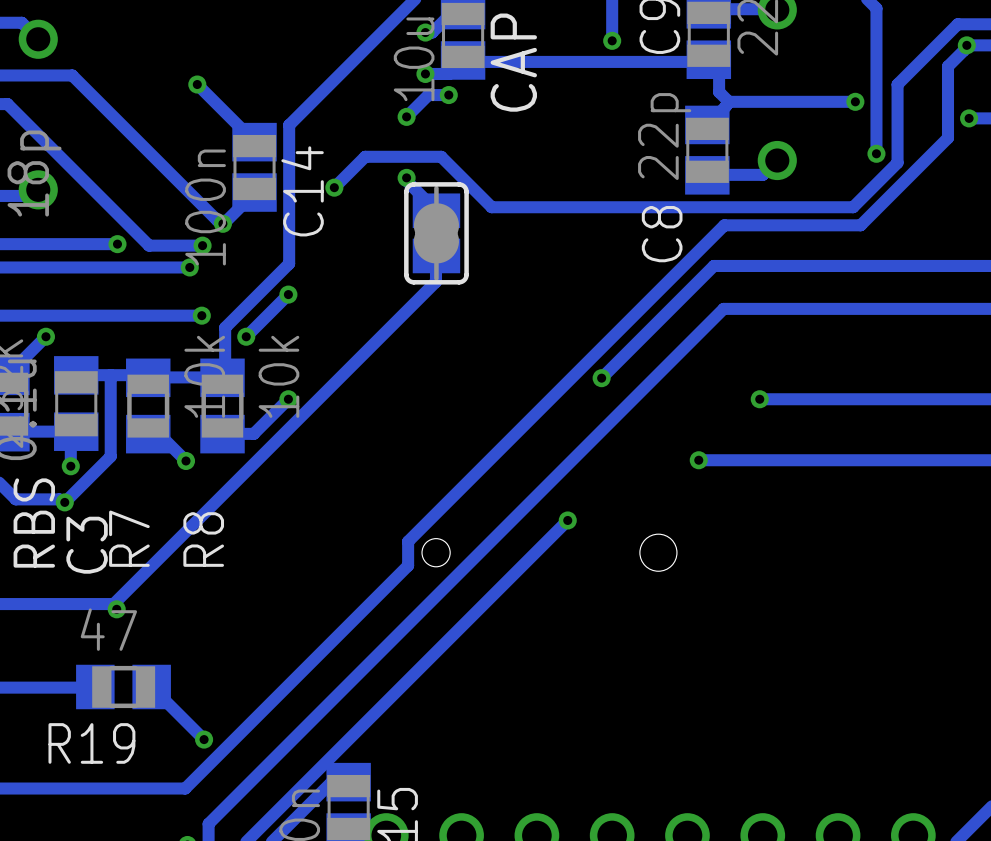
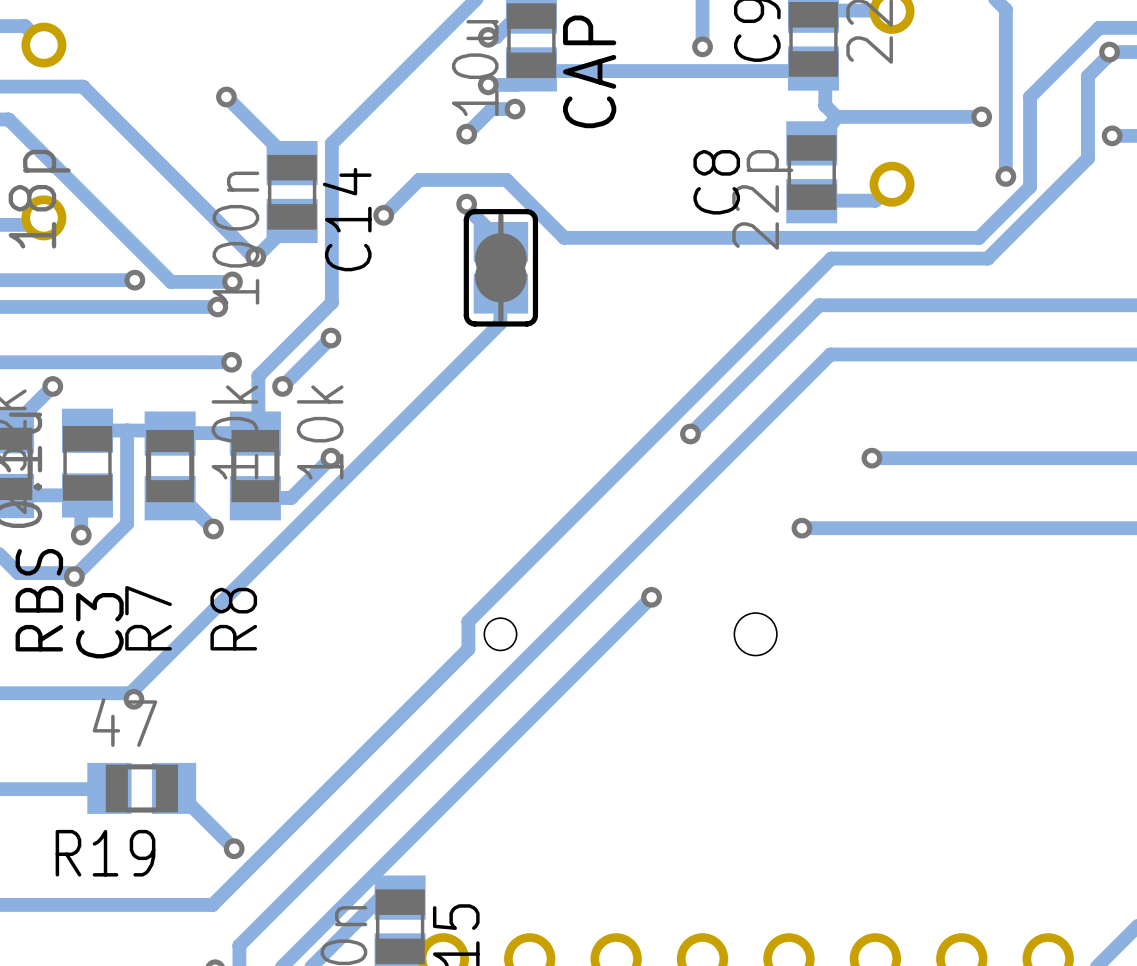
C8 value position: 22p (664, 136) -> 22p (762, 199)
C8 name position: C8 (662, 234) -> C8 (716, 182)

